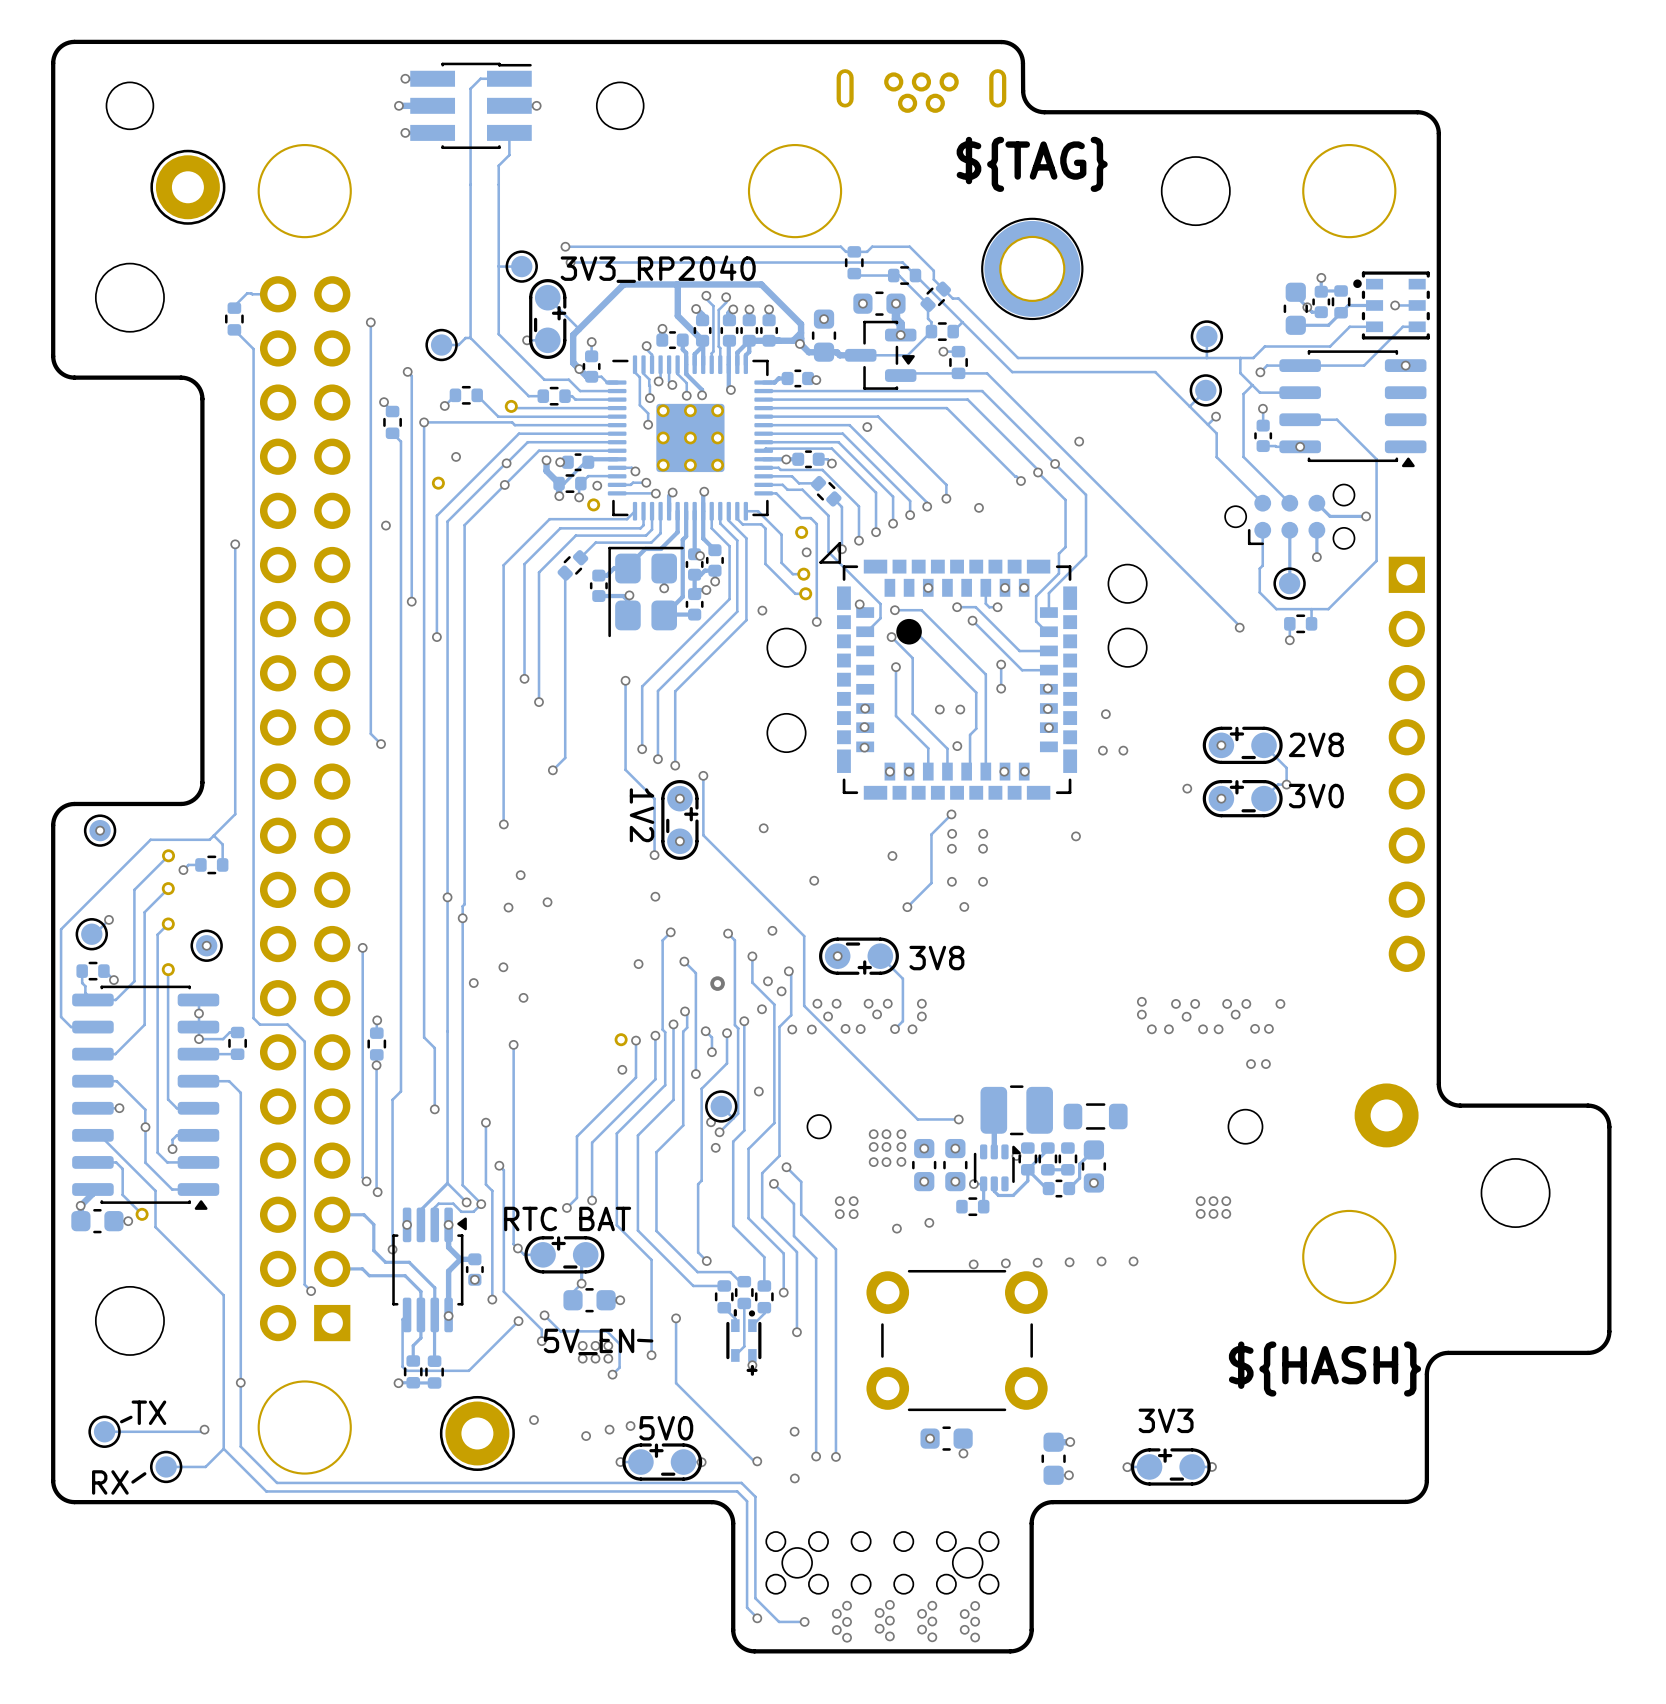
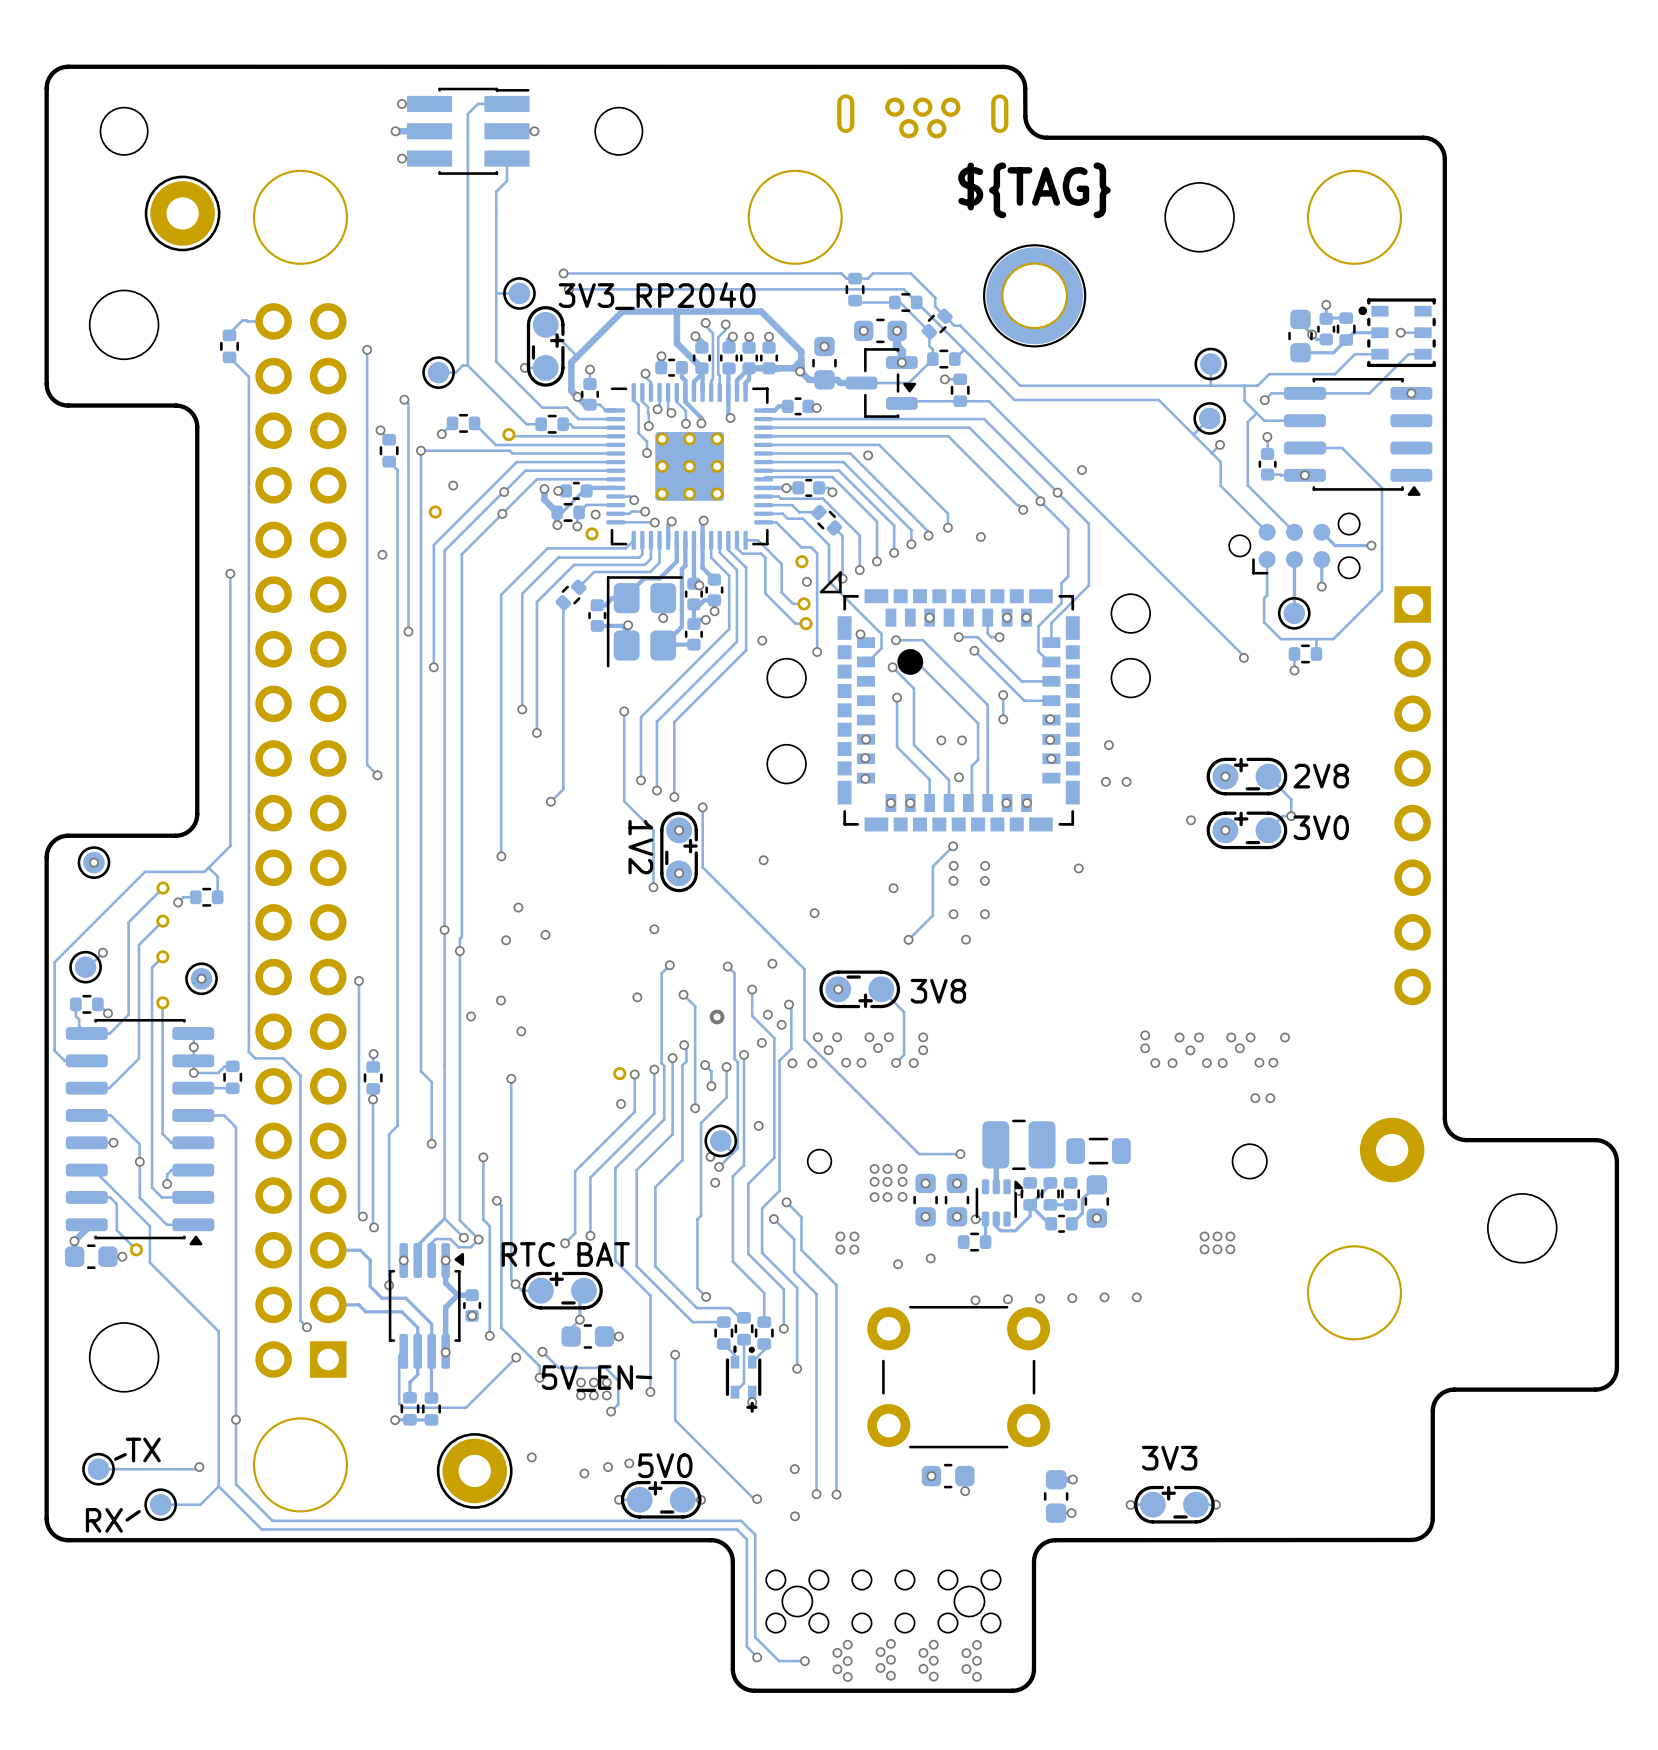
text: ${HASH} (1324, 1369) -> none

